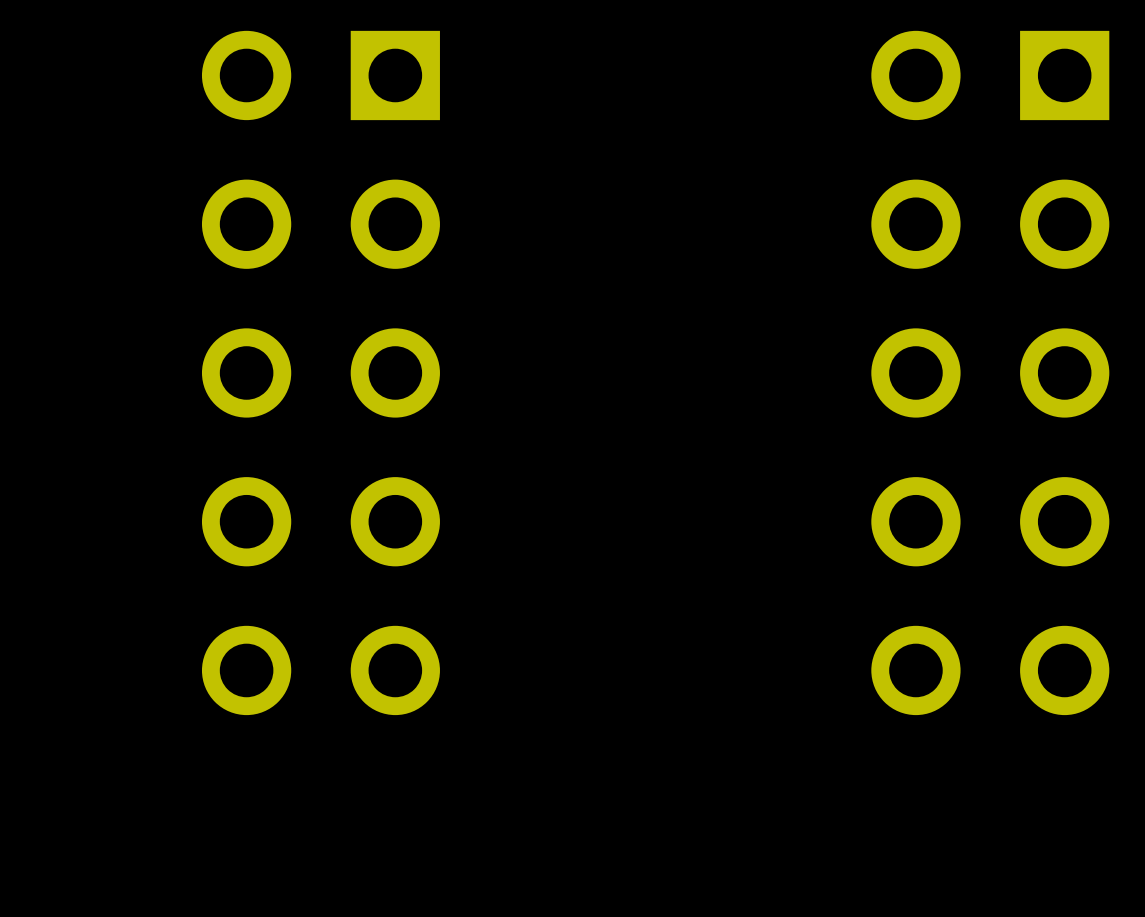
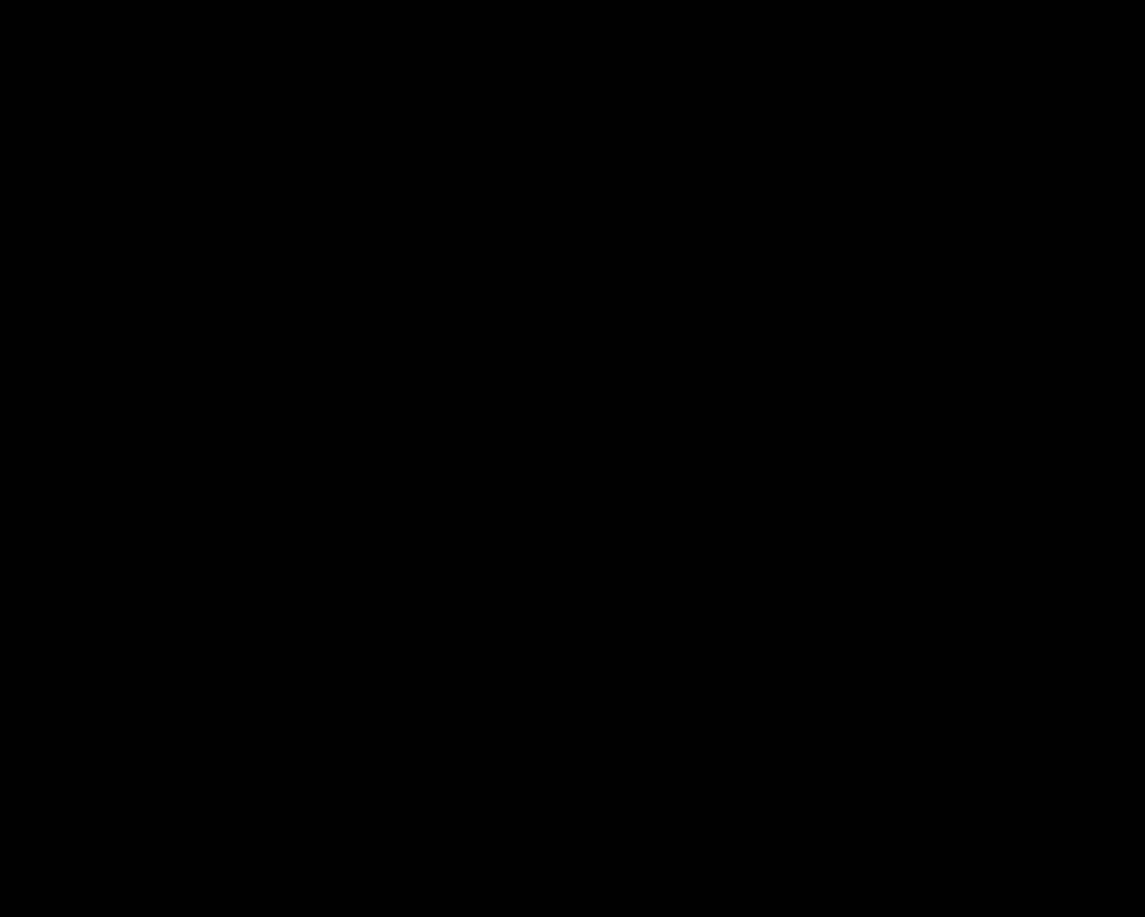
part: (320, 372) -> none
part: (990, 372) -> none

